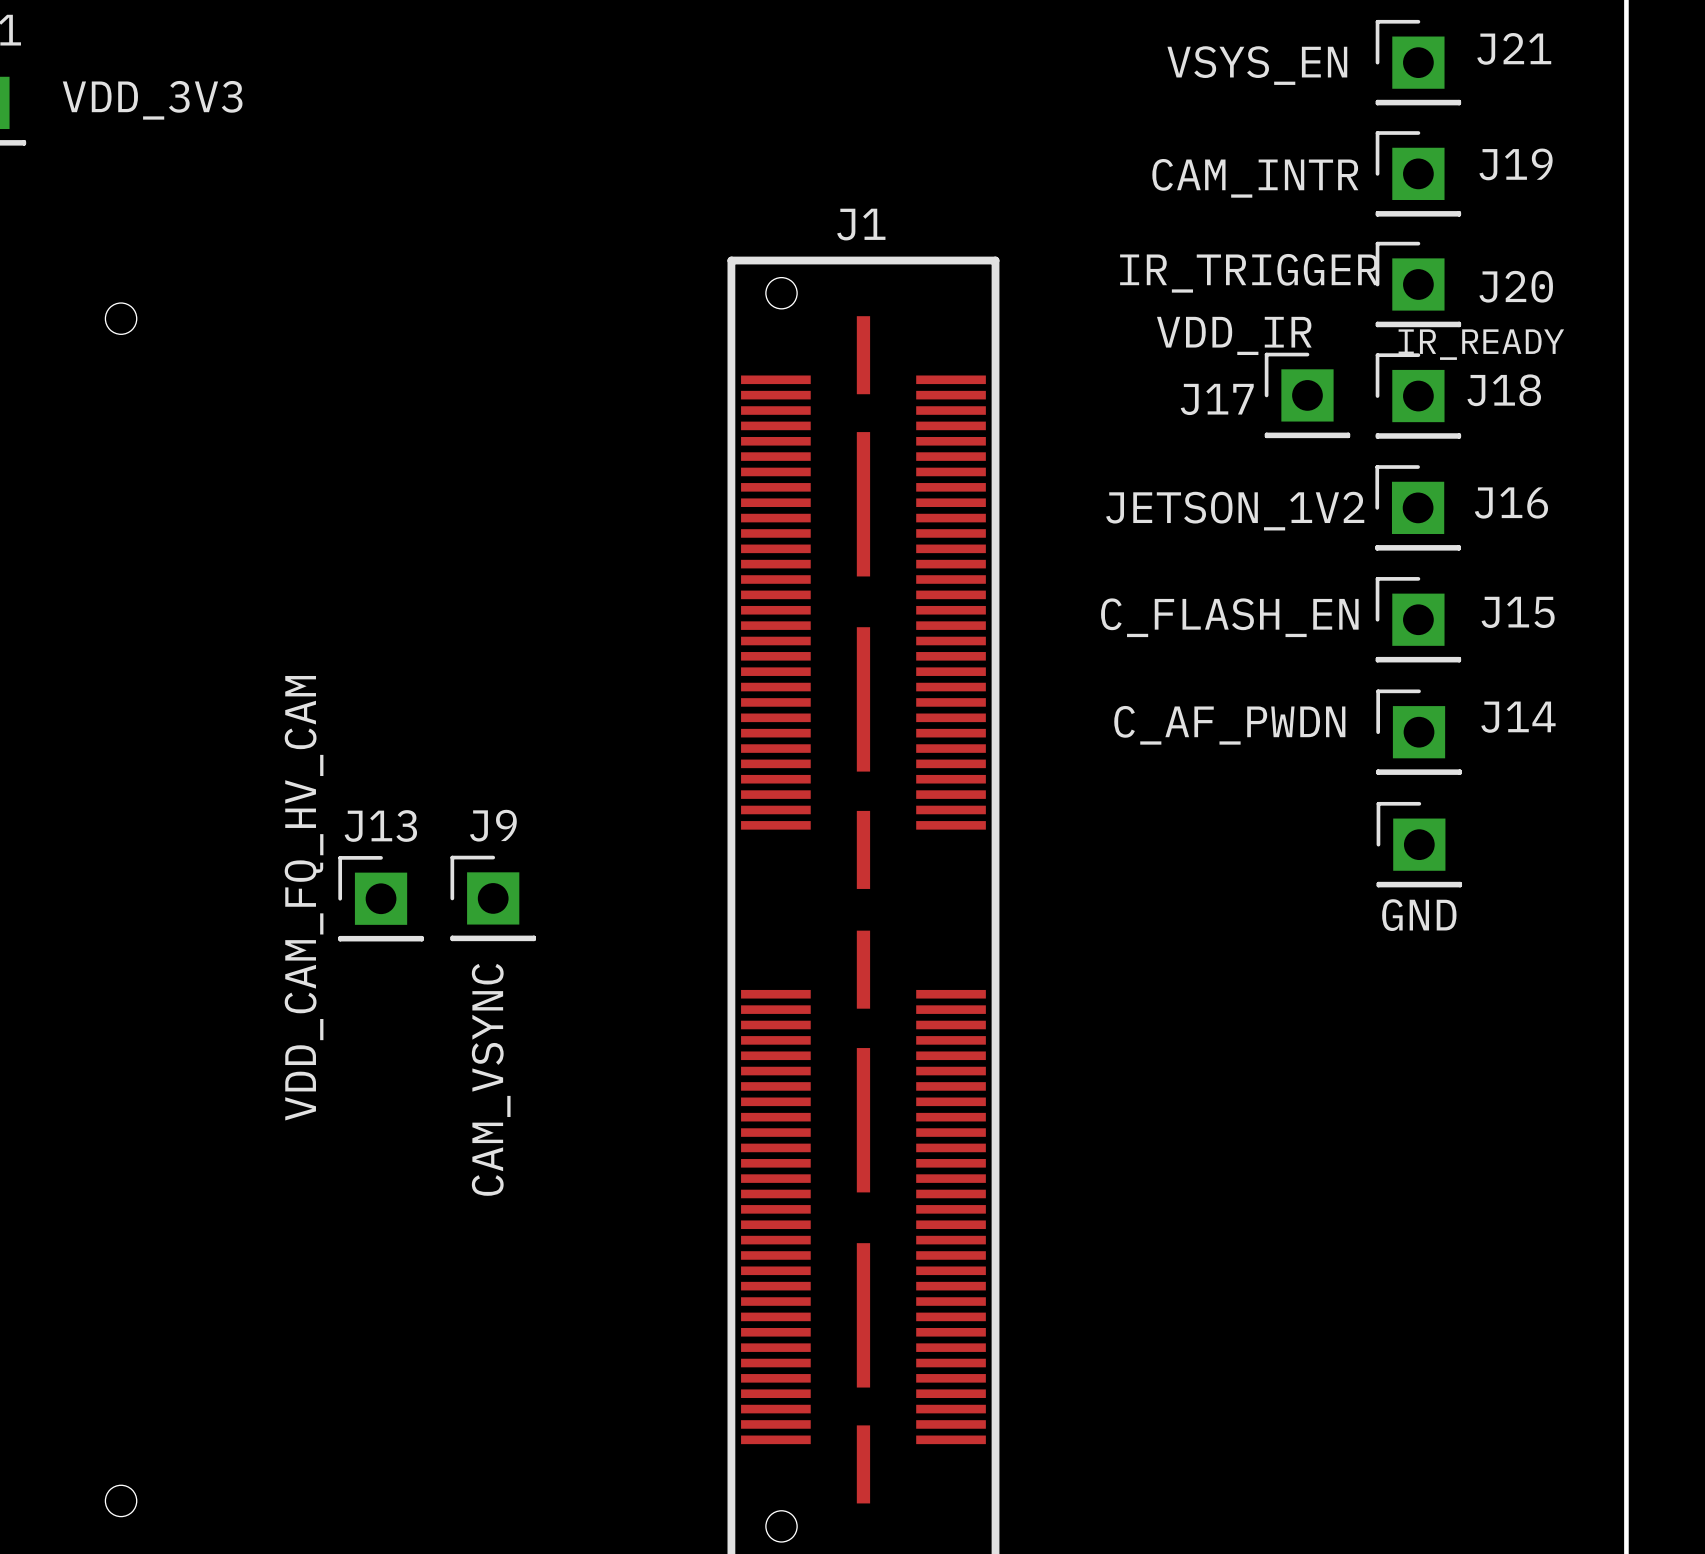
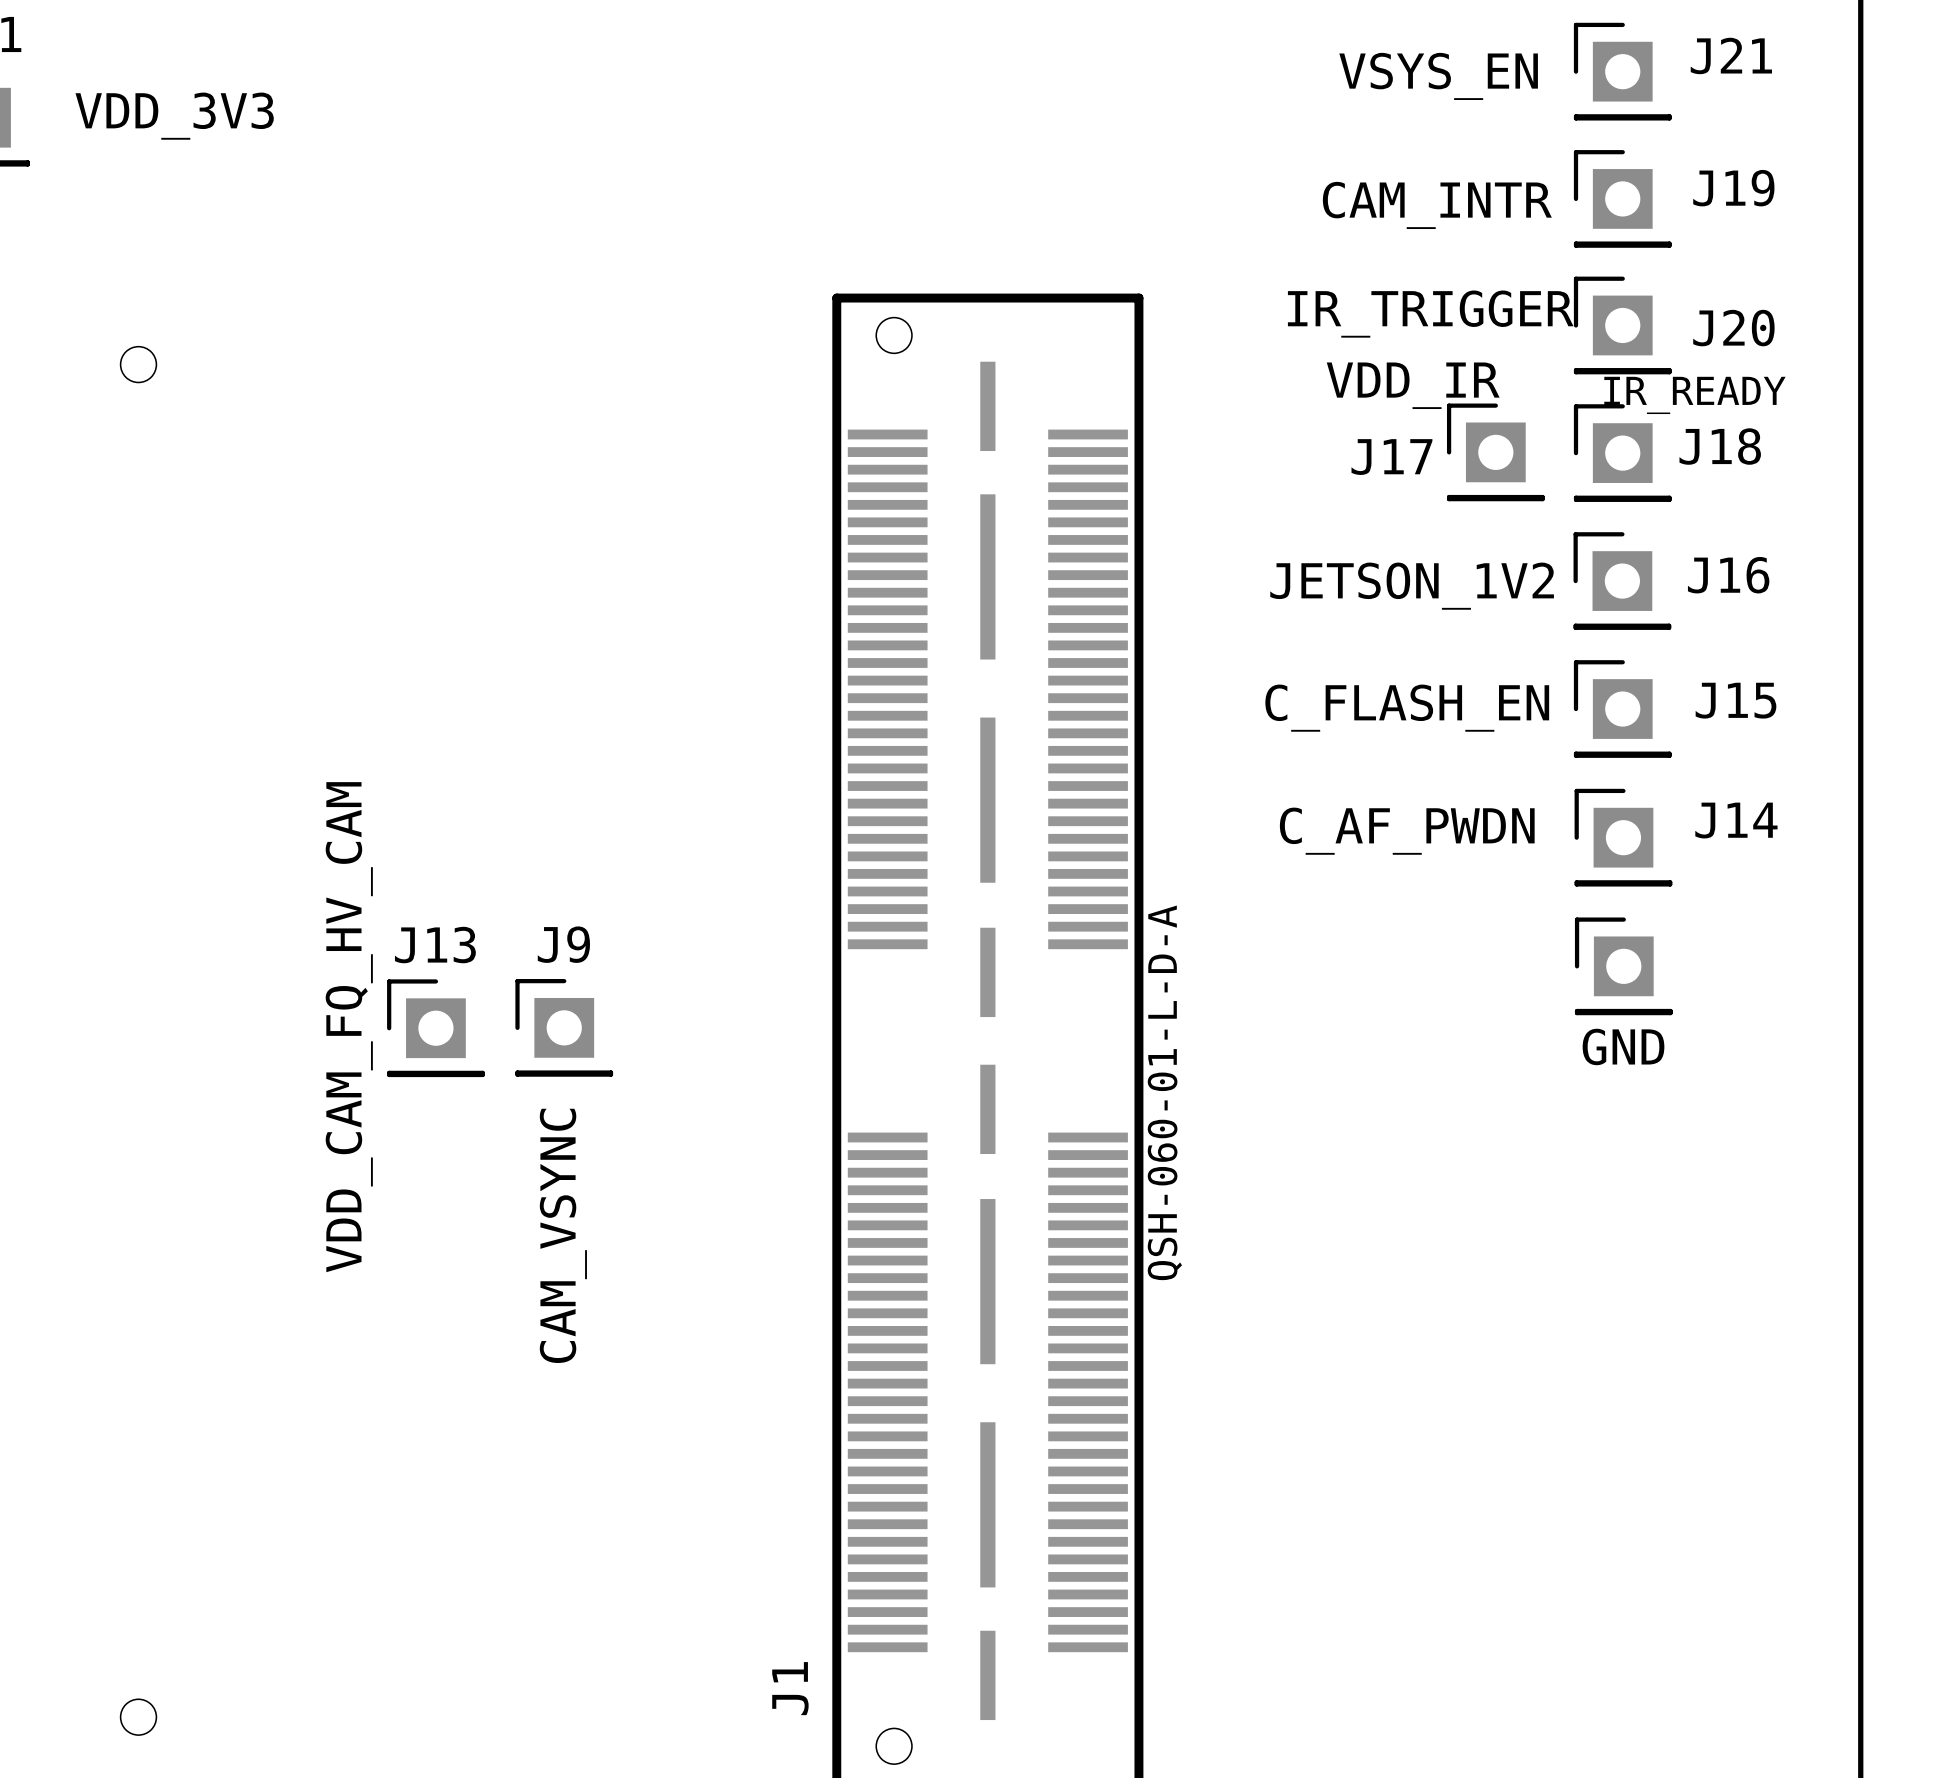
J1 name rotation: 0° (861, 224) -> 90° counterclockwise (790, 1688)
J1 name position: J1 (861, 224) -> J1 (790, 1688)
J1 value: none -> QSH-060-01-L-D-A (1164, 1092)

